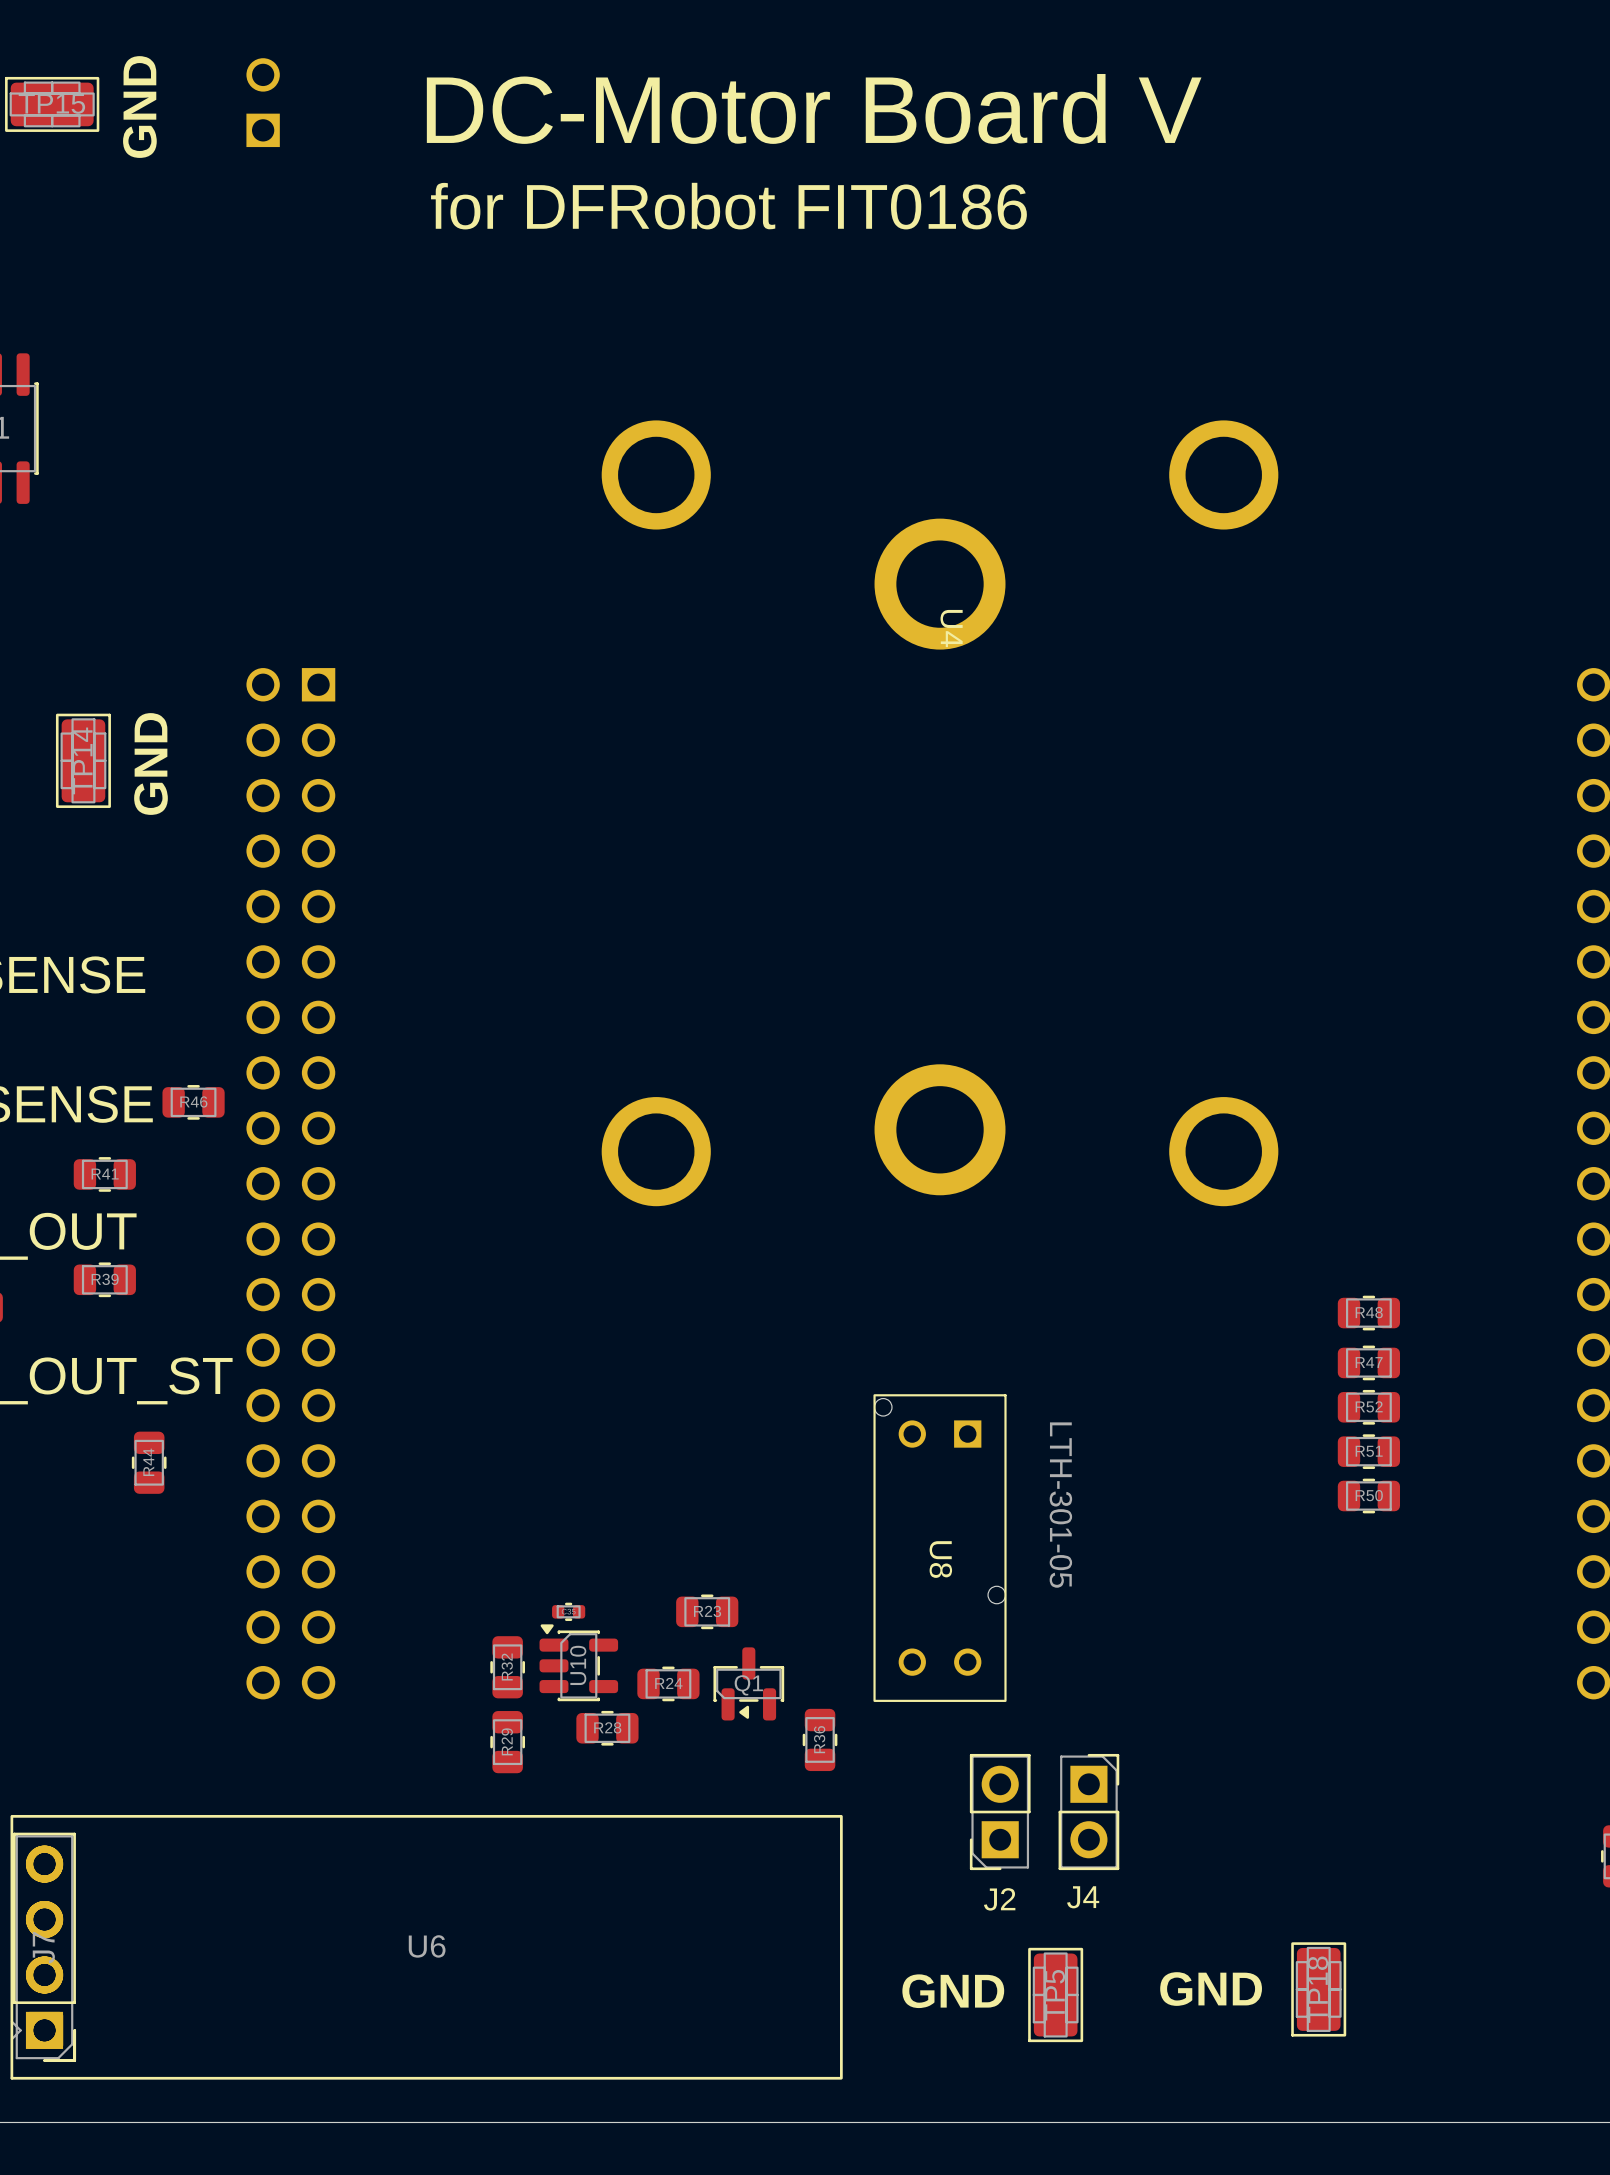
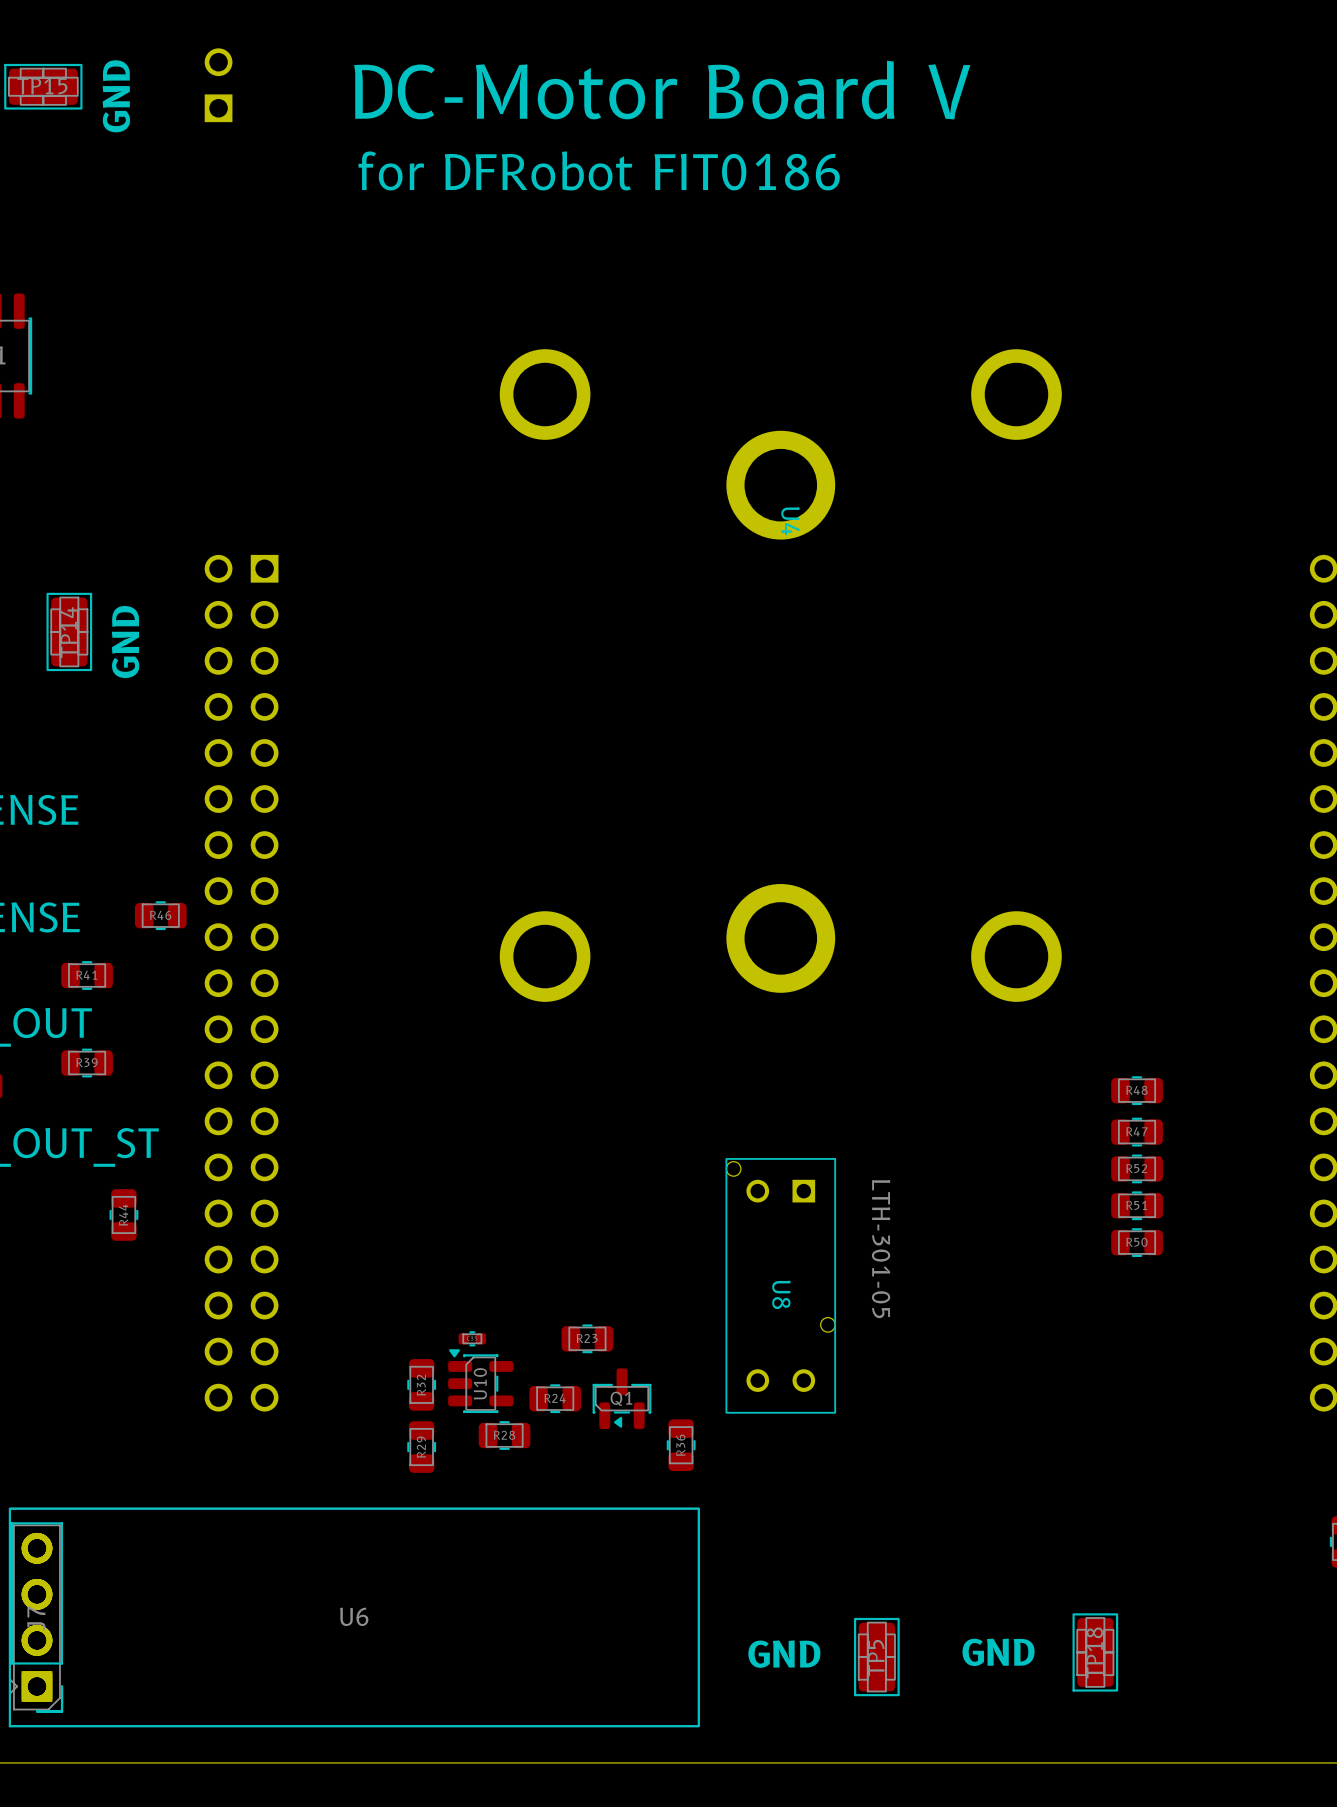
J2: (1000, 1812) -> none
J4: (1088, 1812) -> none

